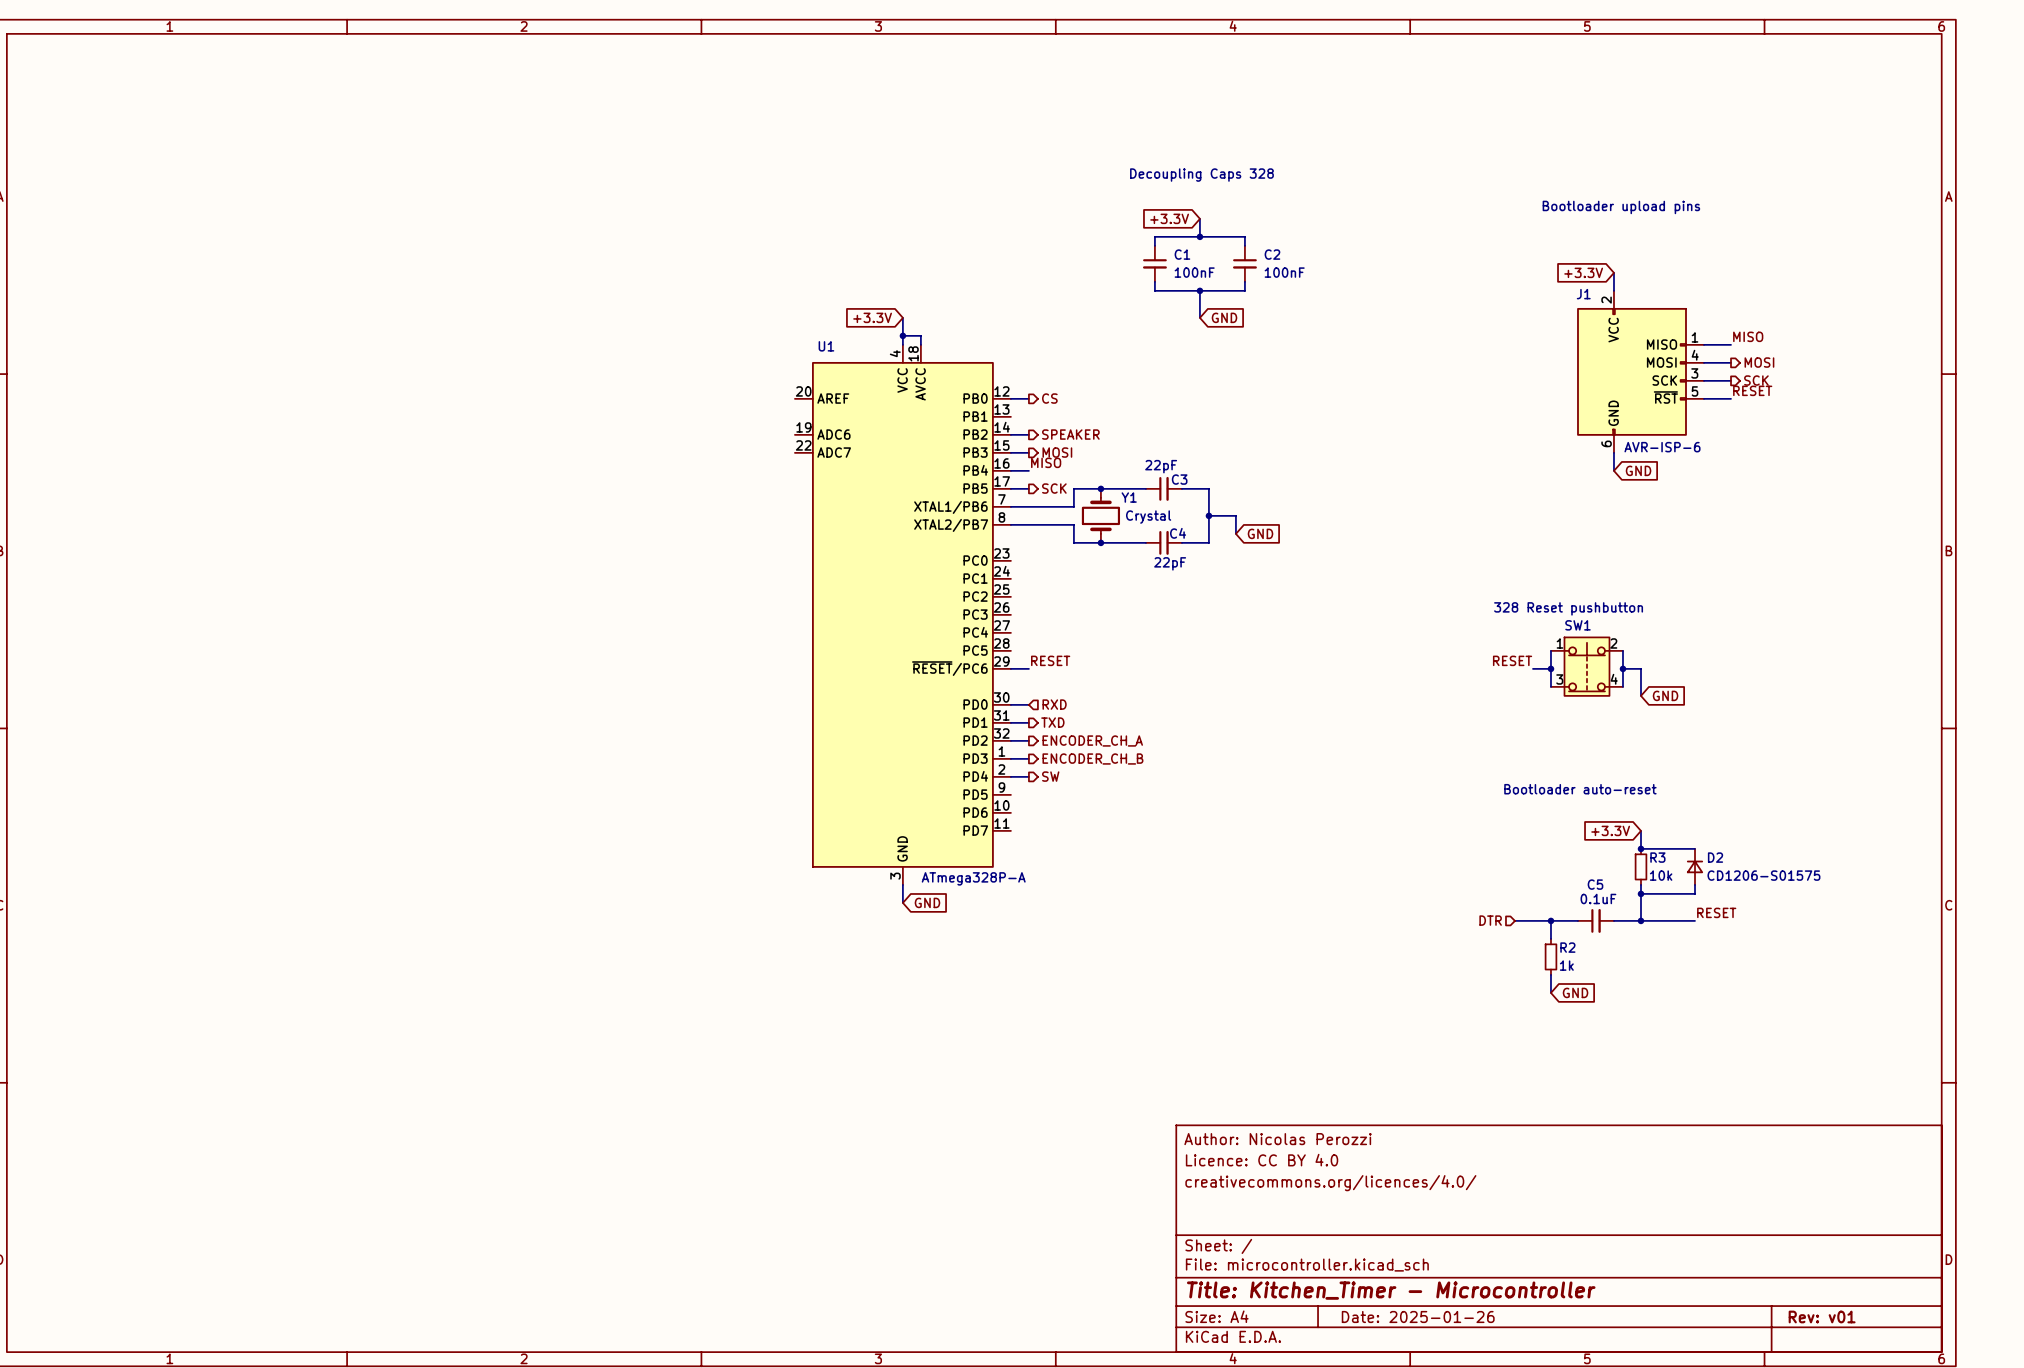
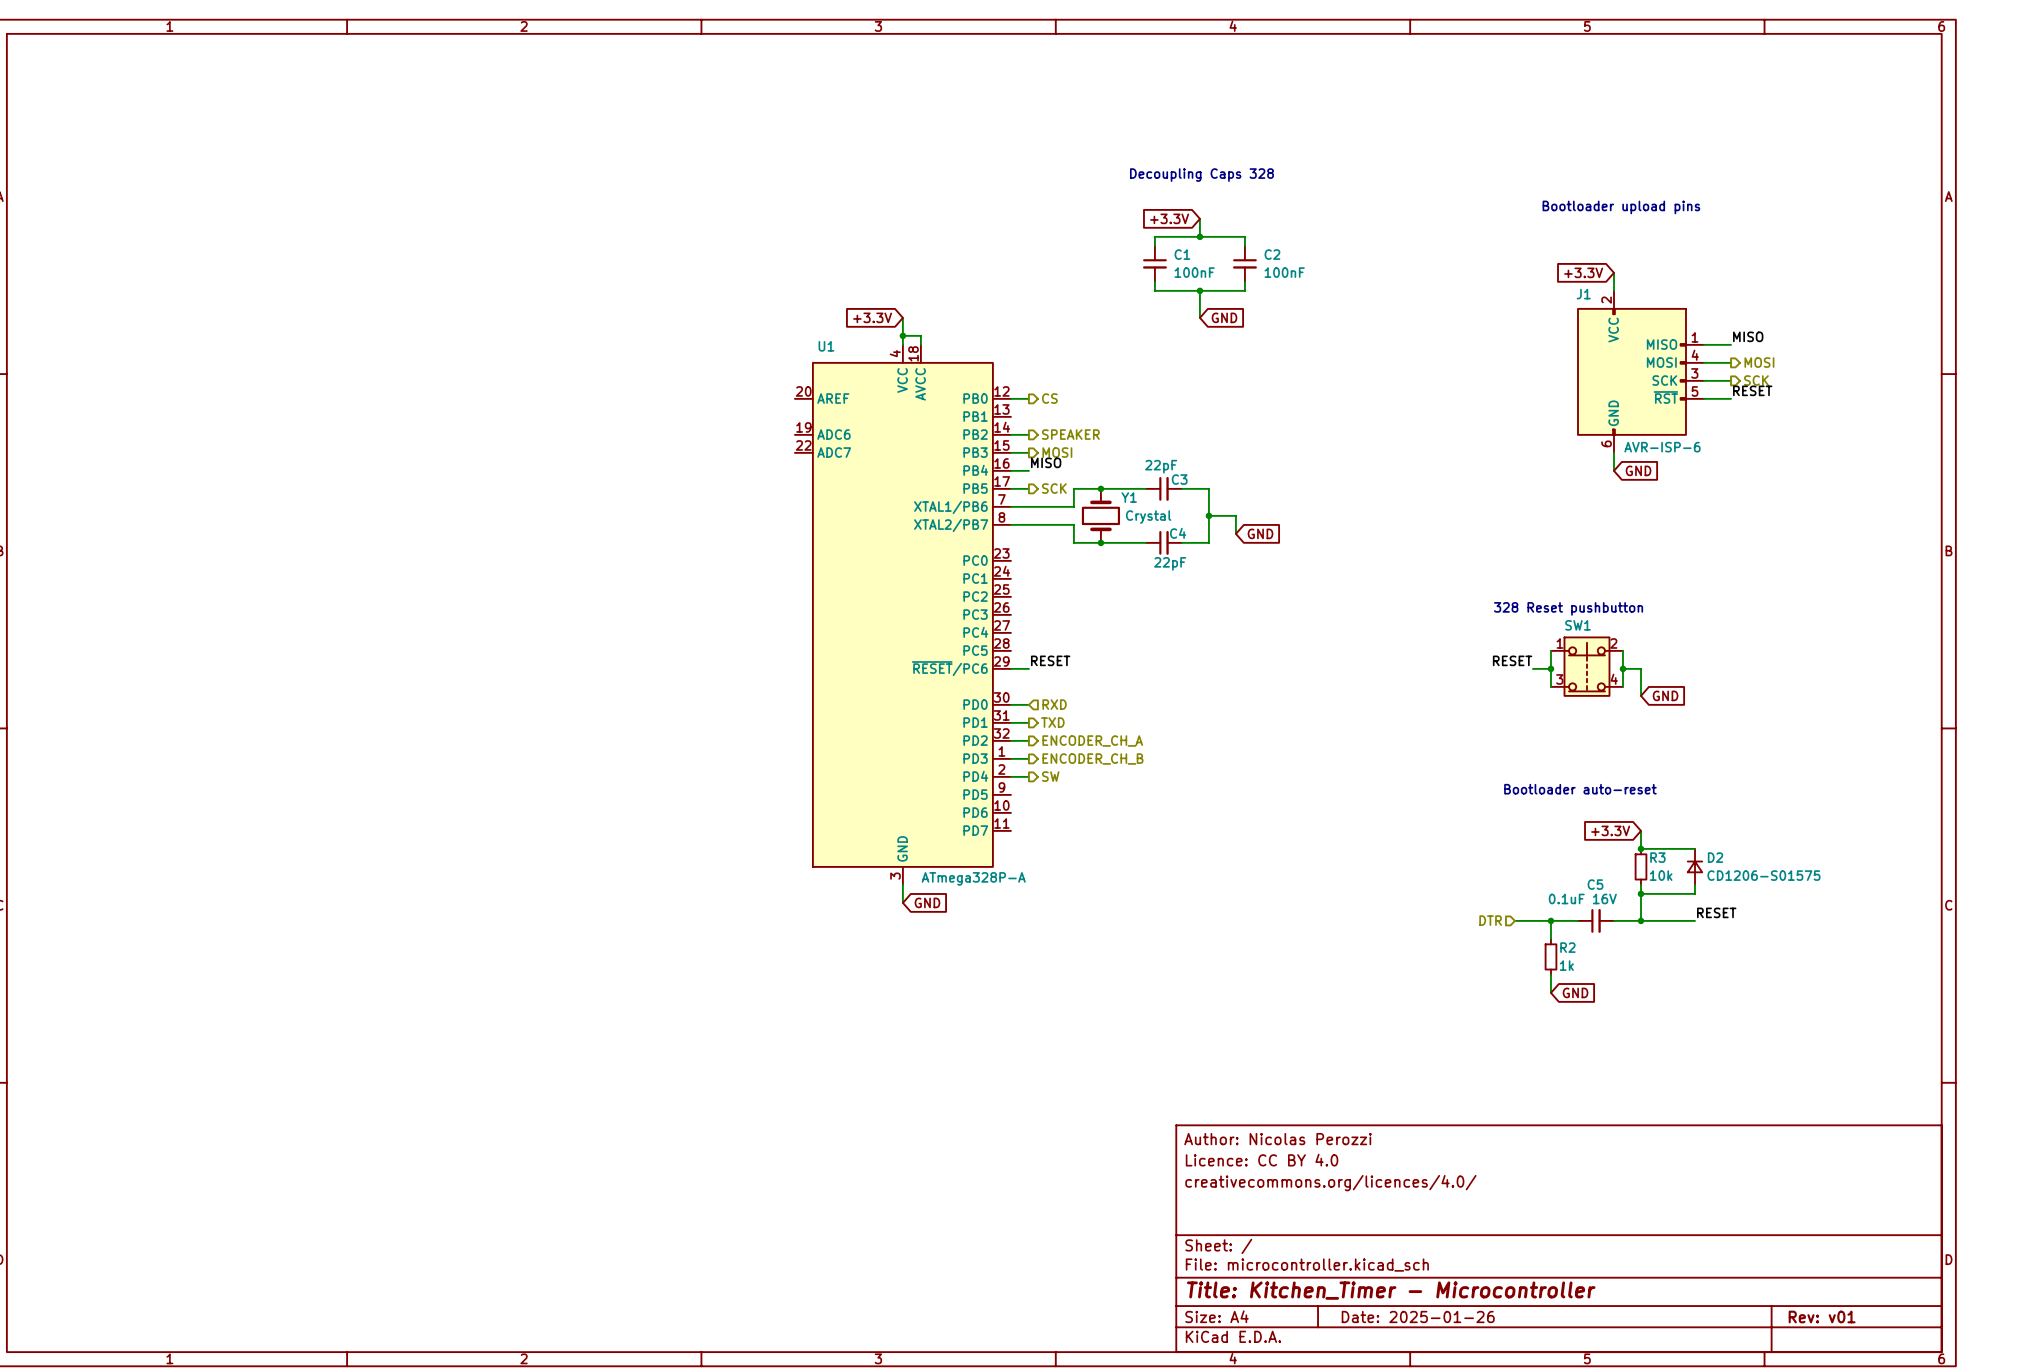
C5 value: 0.1uF (1598, 898) -> 0.1uF 16V (1582, 898)

